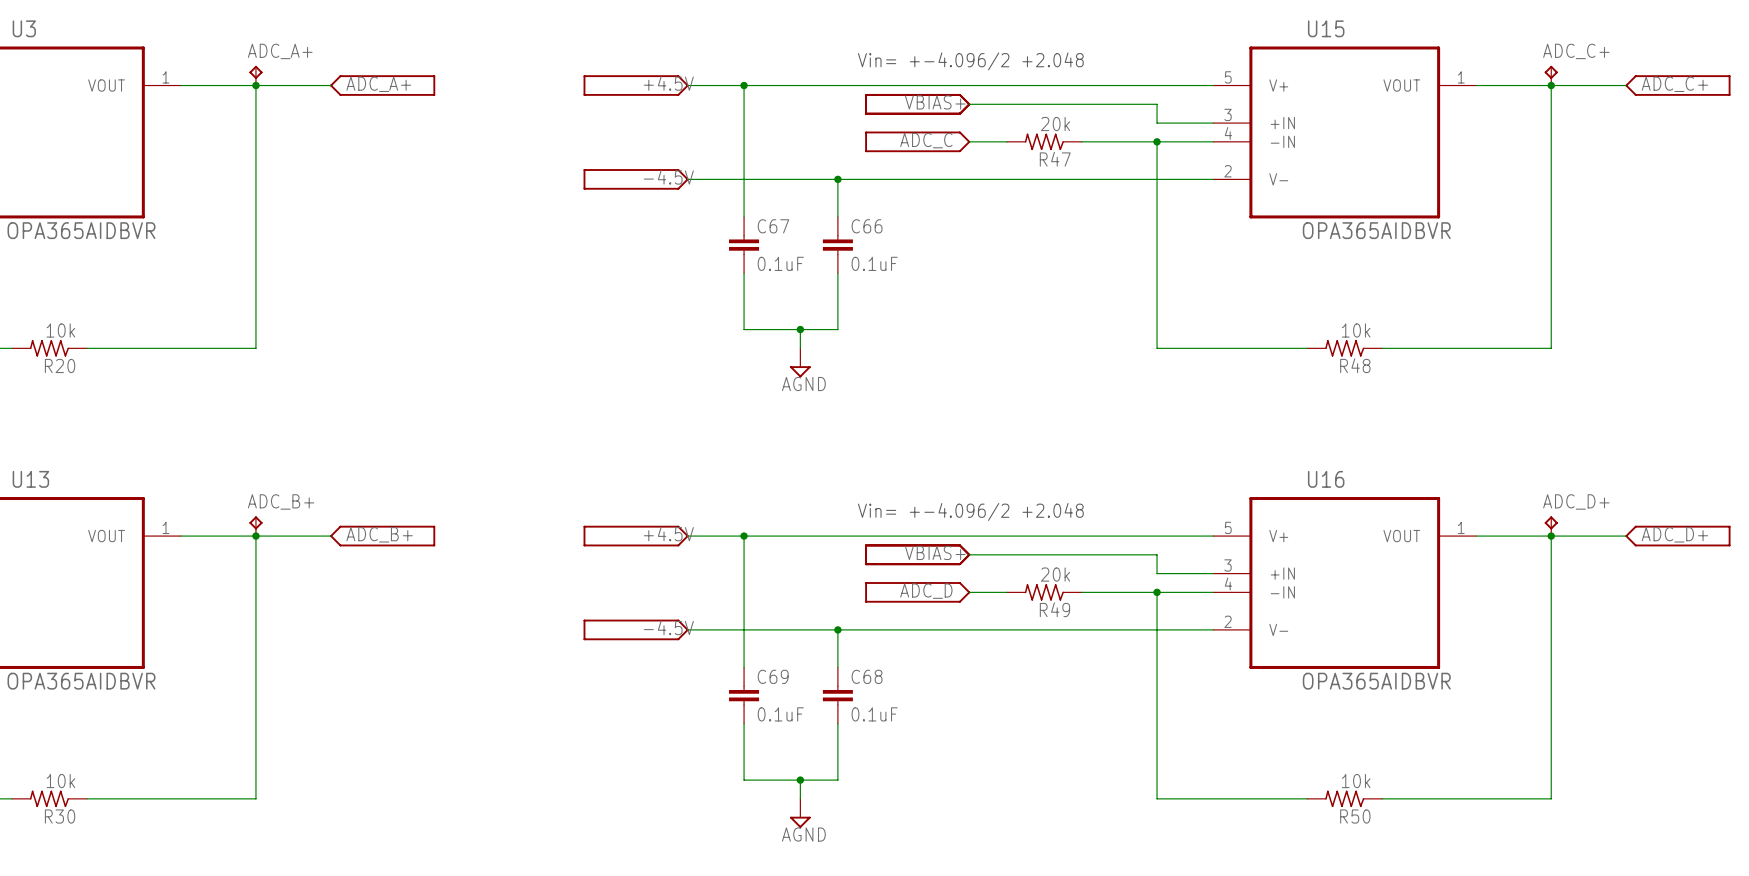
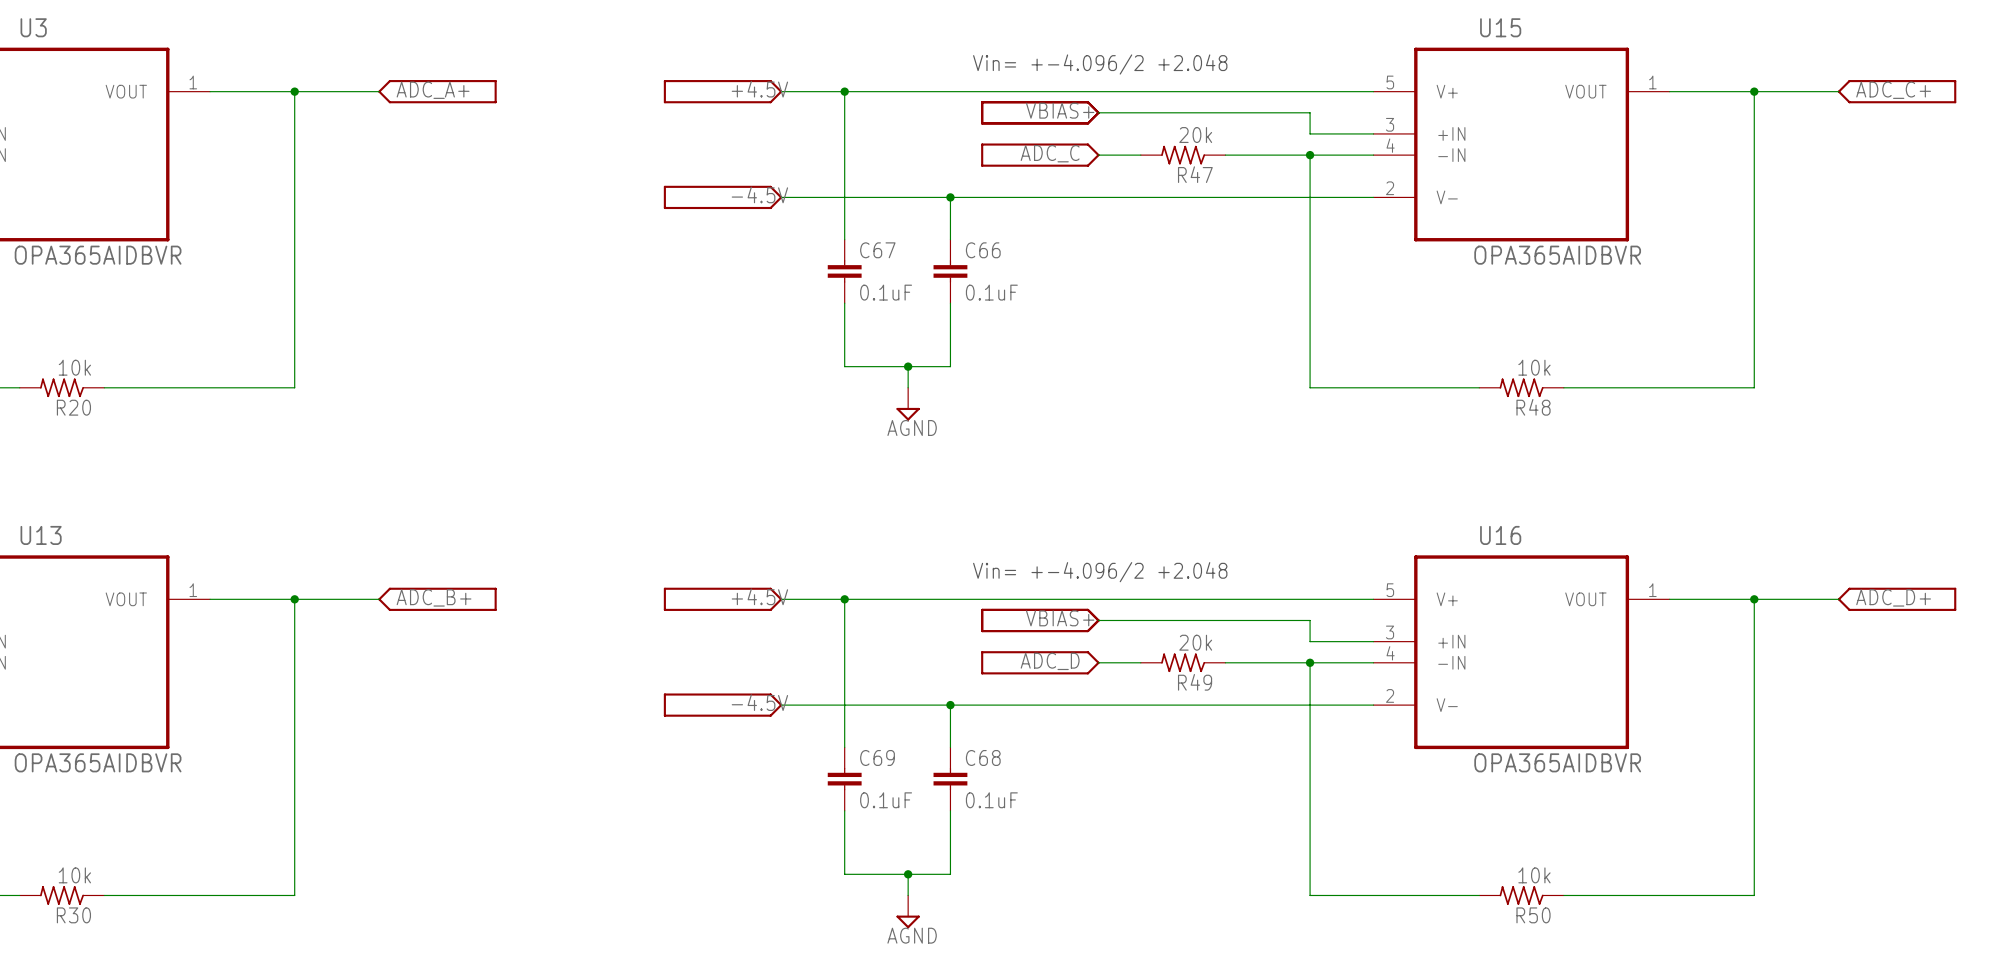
ADC_A+: (255, 75) -> none
ADC_C+: (1551, 75) -> none
ADC_B+: (255, 526) -> none
ADC_D+: (1551, 526) -> none

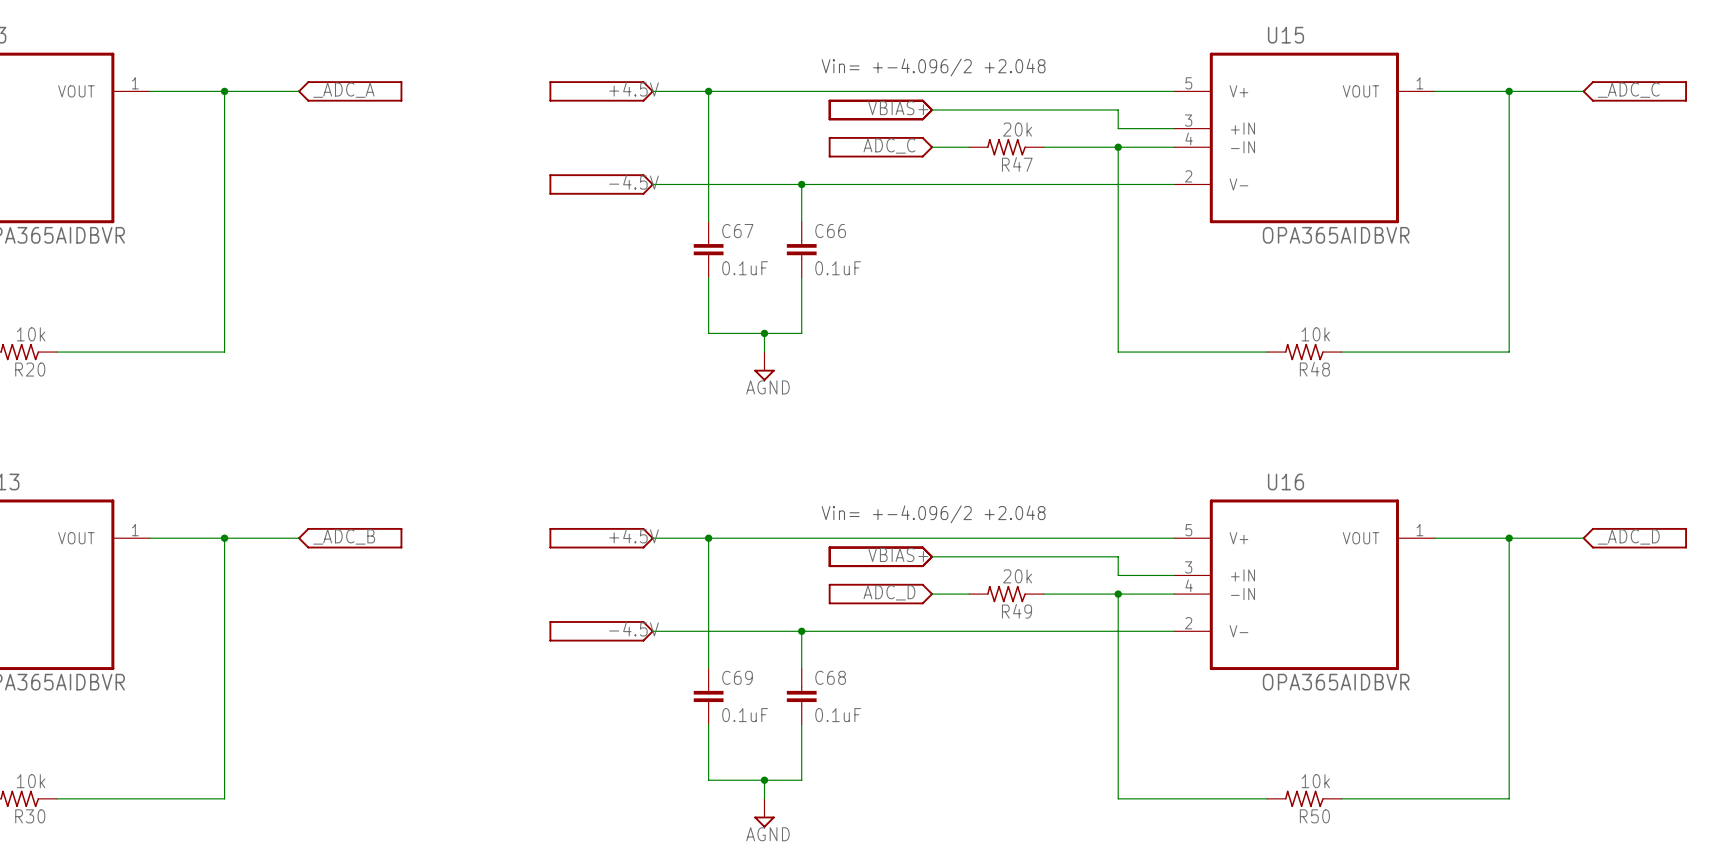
label: ADC_A+ (433, 90) -> _ADC_A (343, 90)
label: ADC_C+ (1893, 90) -> _ADC_C (1628, 90)
label: ADC_B+ (434, 597) -> _ADC_B (344, 536)
label: ADC_D+ (1893, 597) -> _ADC_D (1628, 536)

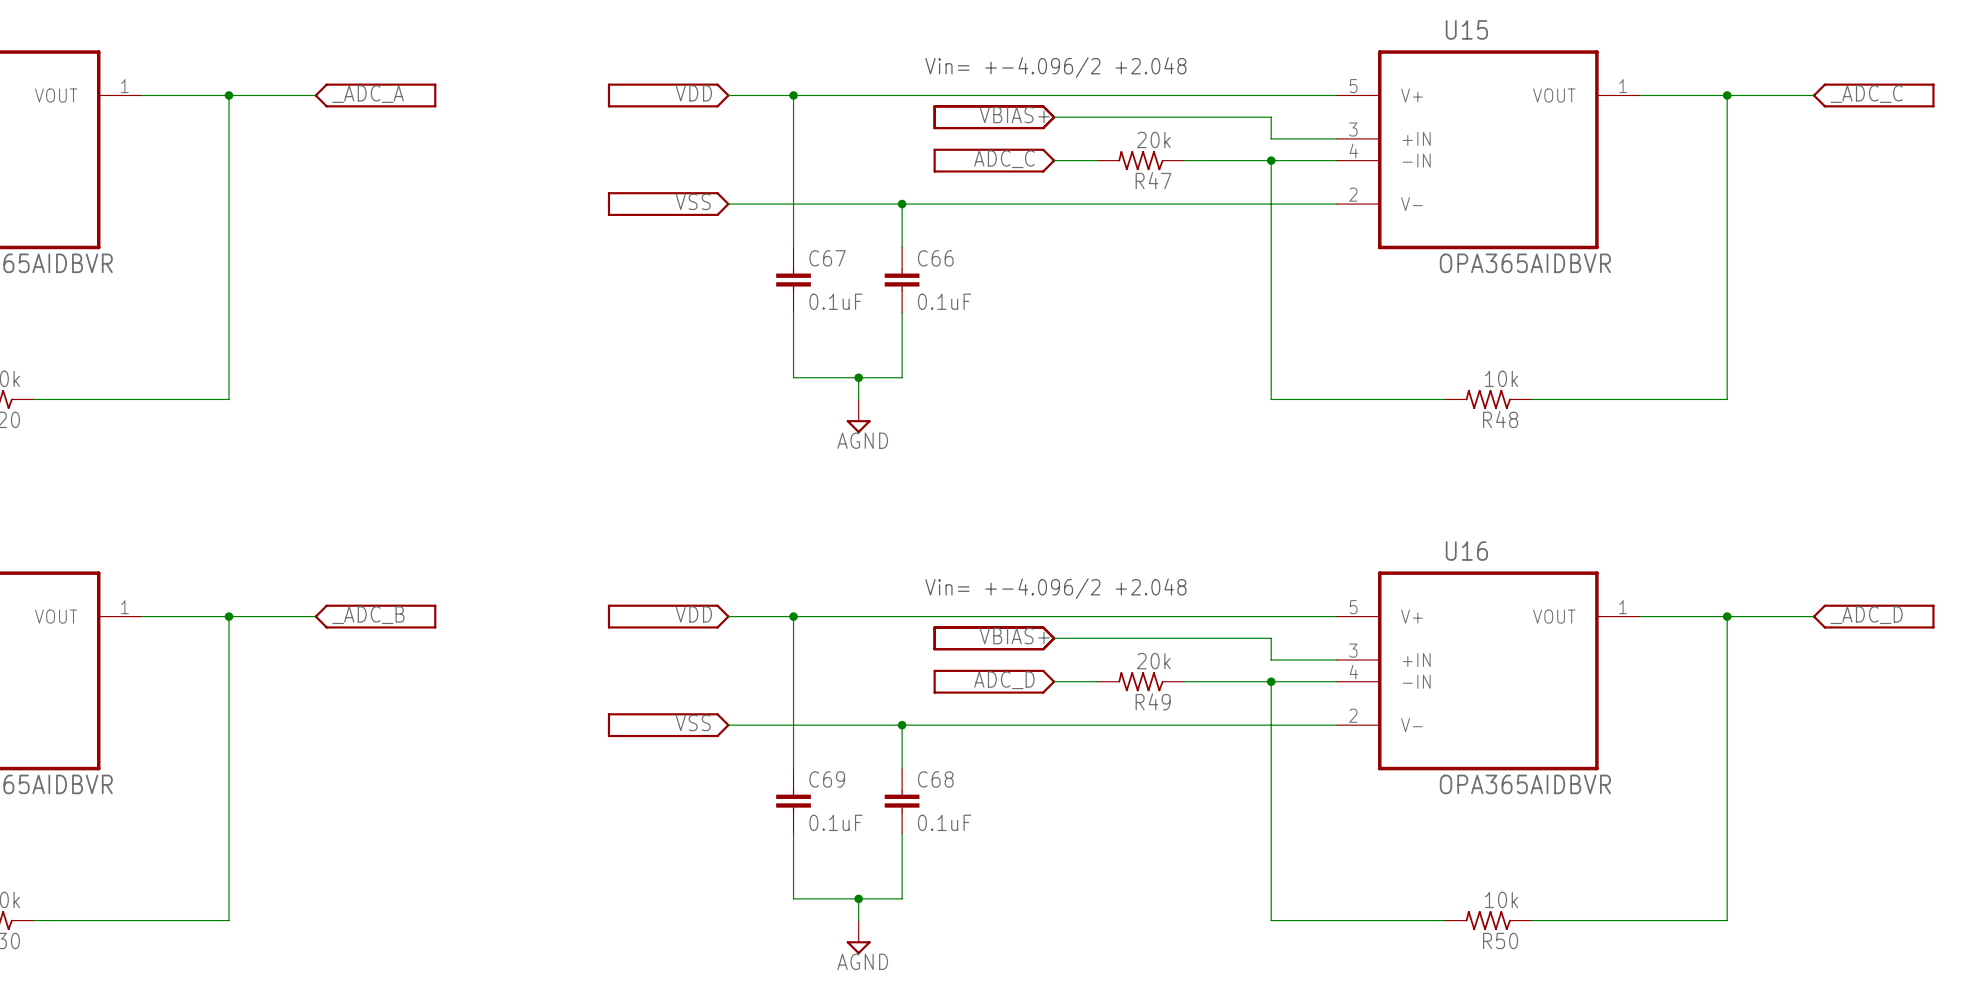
label: +4.5V (634, 89) -> VDD (693, 93)
label: -4.5V (634, 182) -> VSS (693, 201)
label: +4.5V (634, 536) -> VDD (693, 614)
label: -4.5V (634, 629) -> VSS (693, 722)

